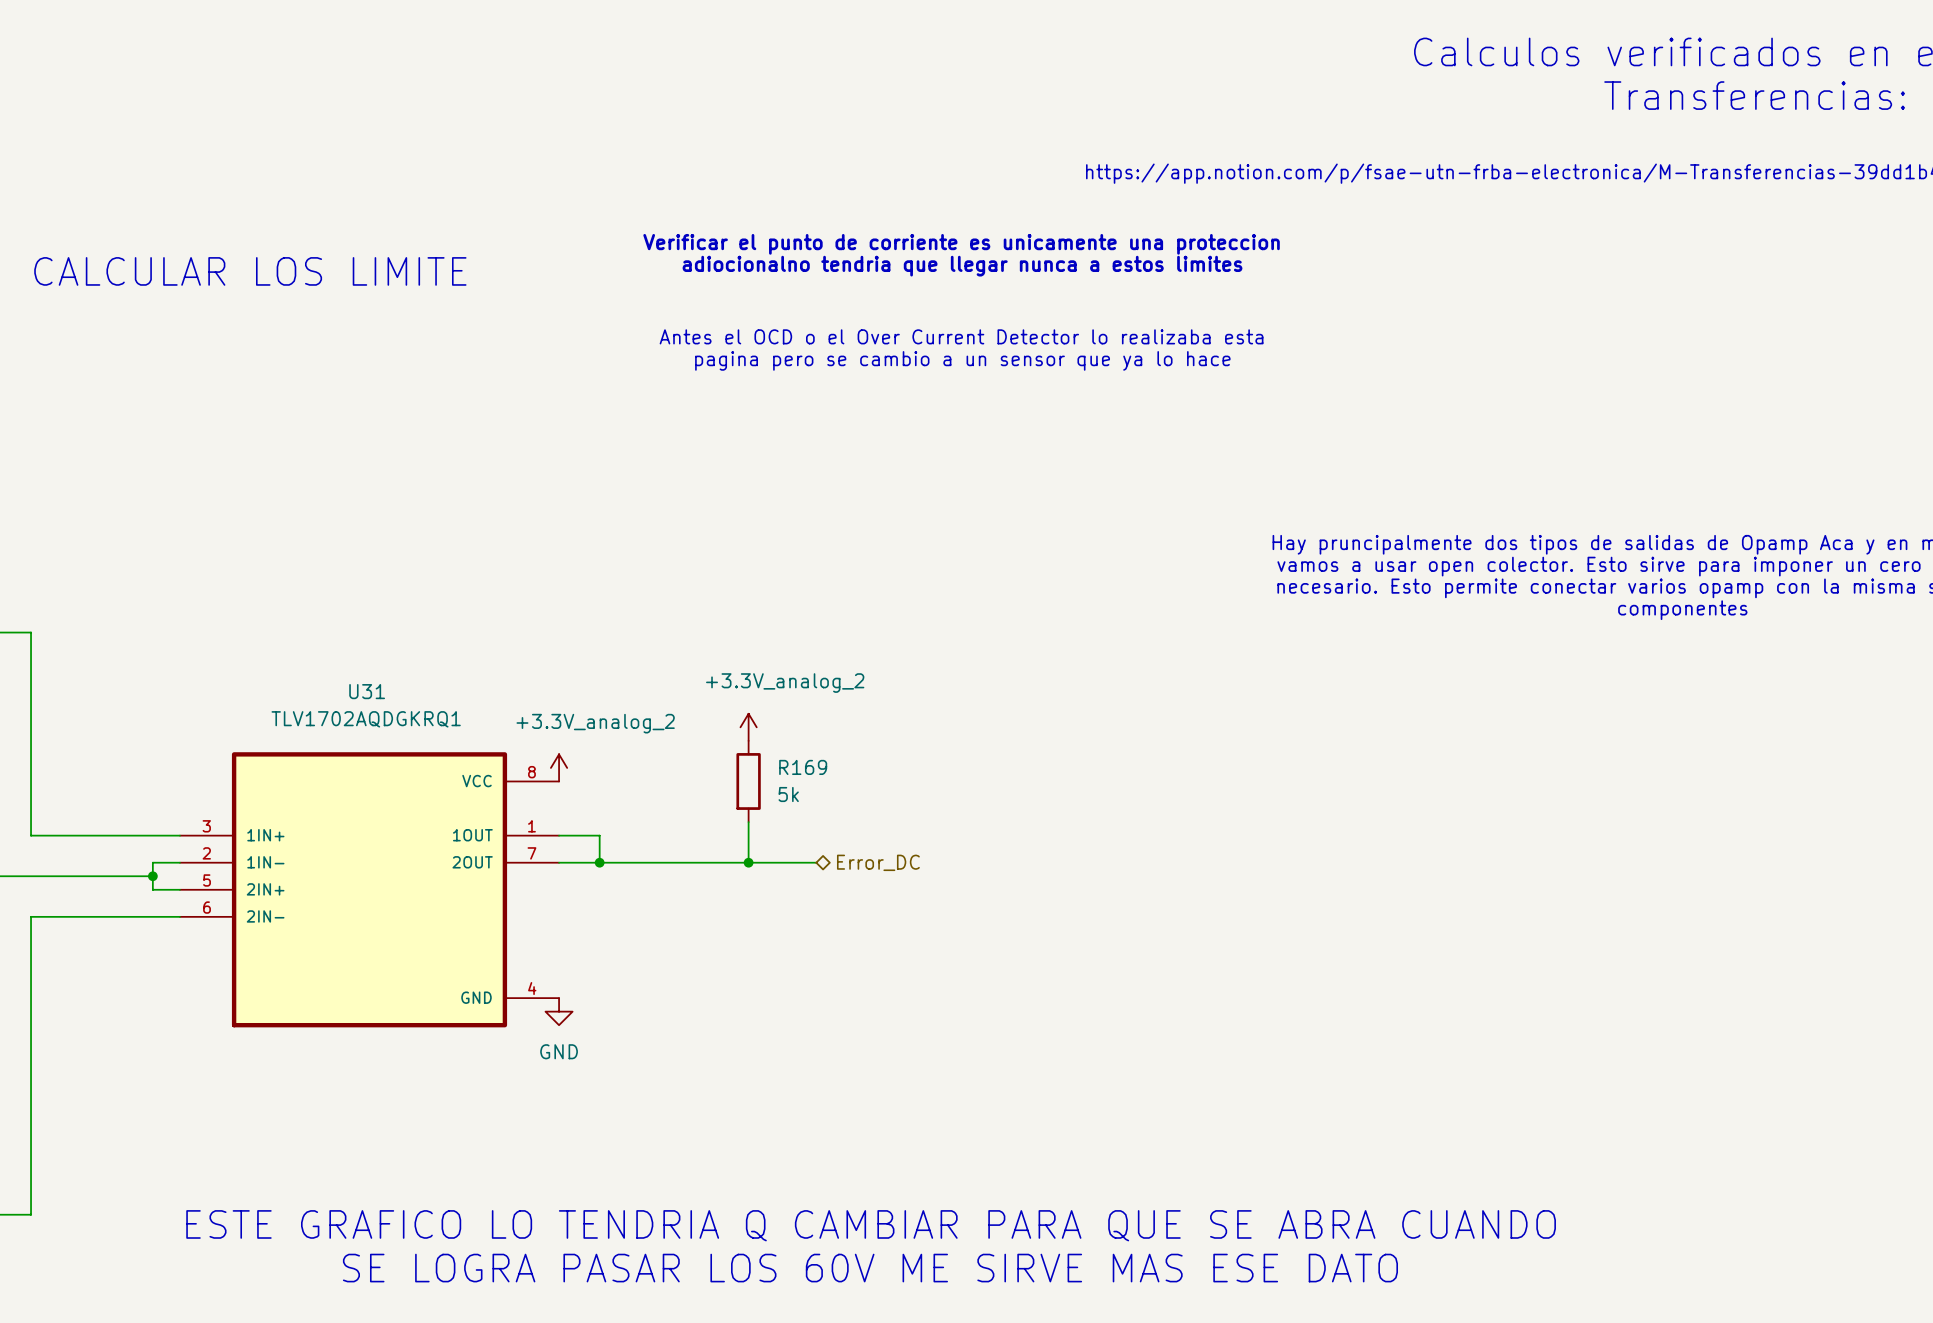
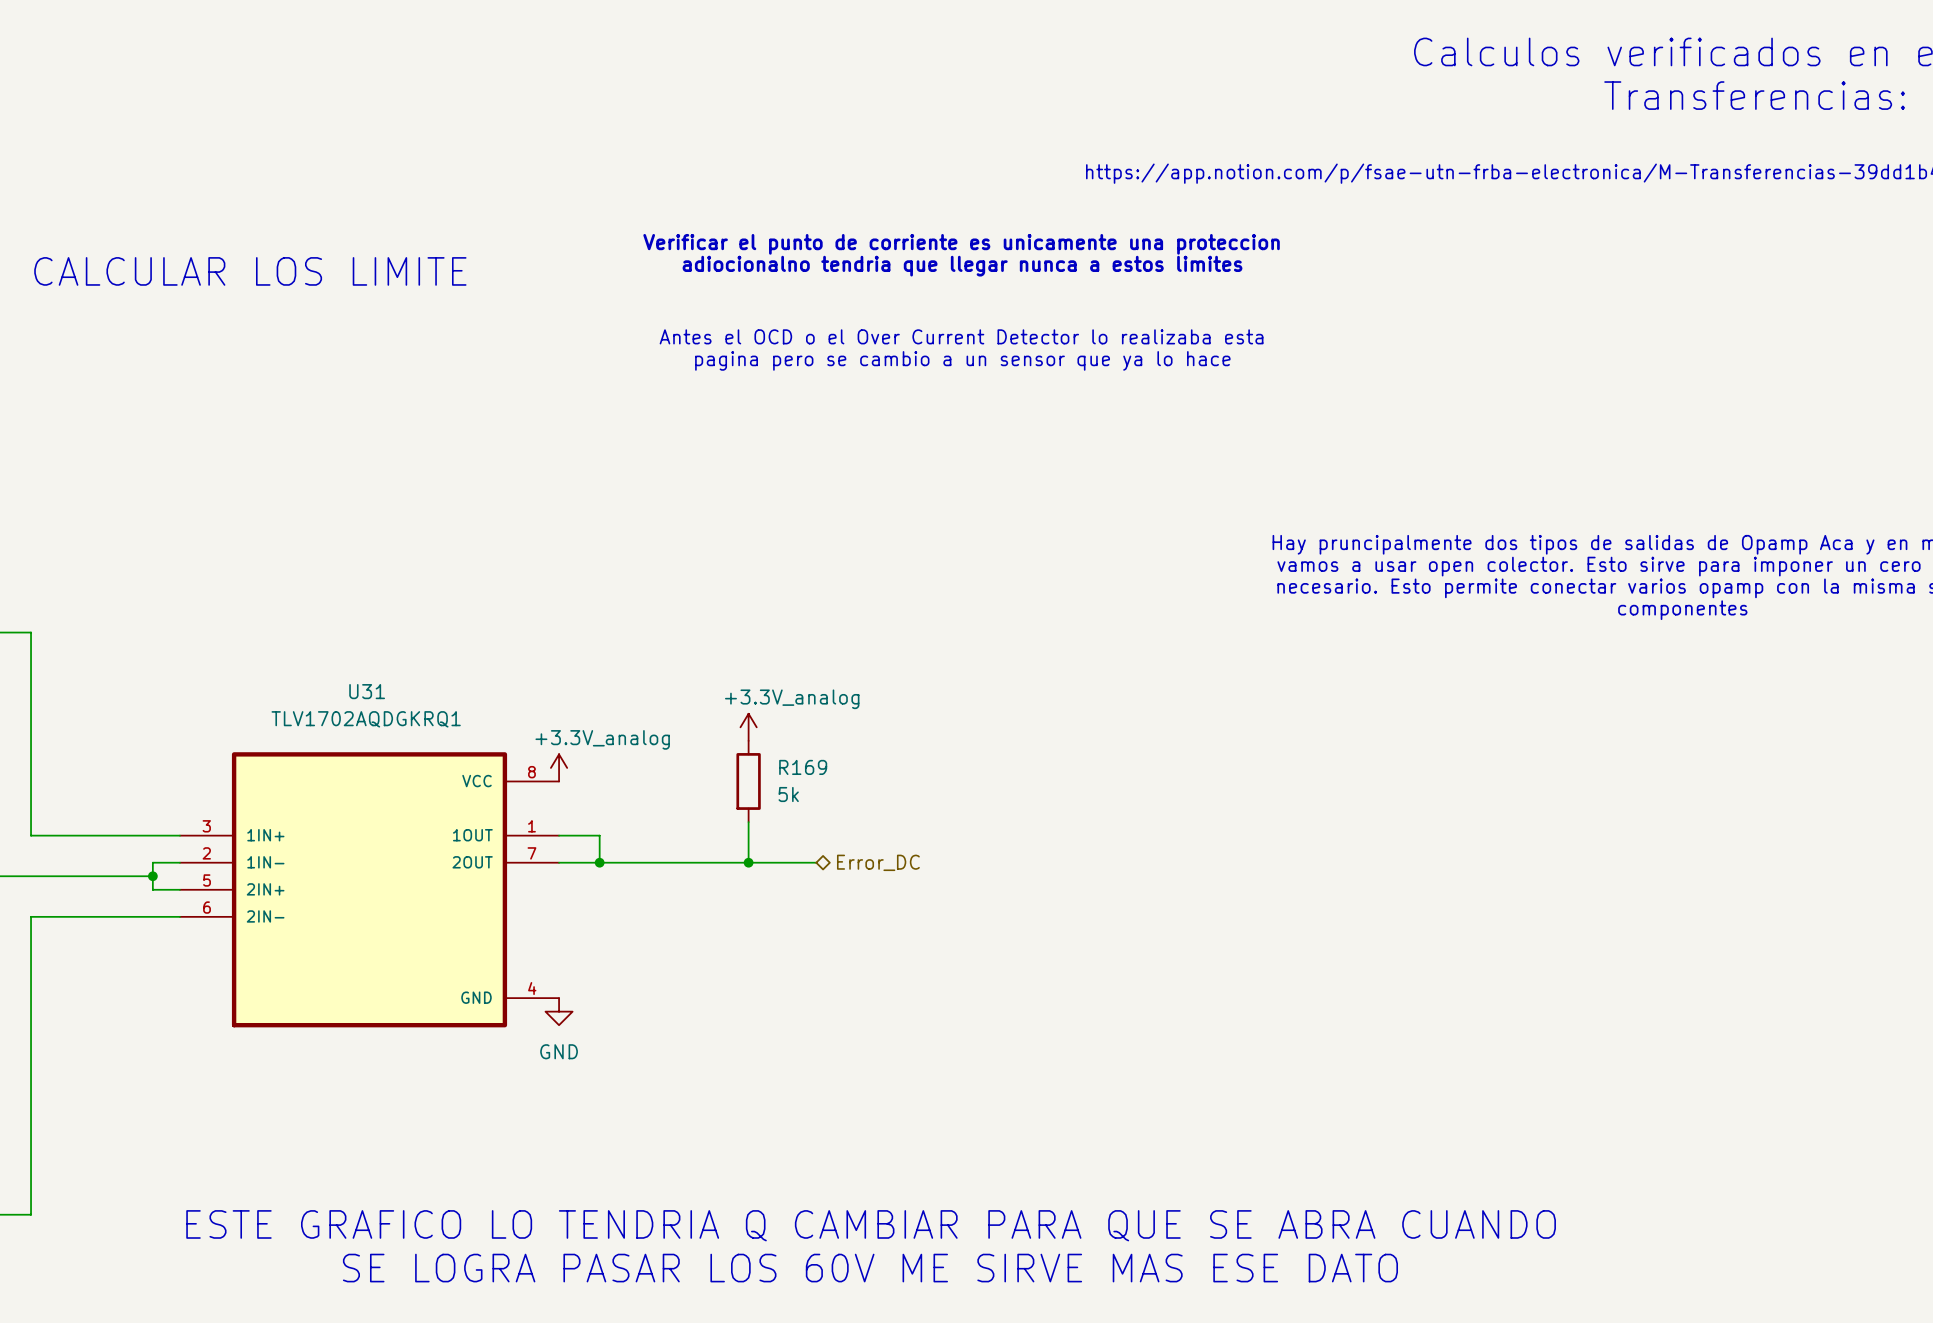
power symbol: +3.3V_analog_2 (748, 727) -> +3.3V_analog (748, 727)
power symbol: +3.3V_analog_2 (559, 767) -> +3.3V_analog (559, 767)

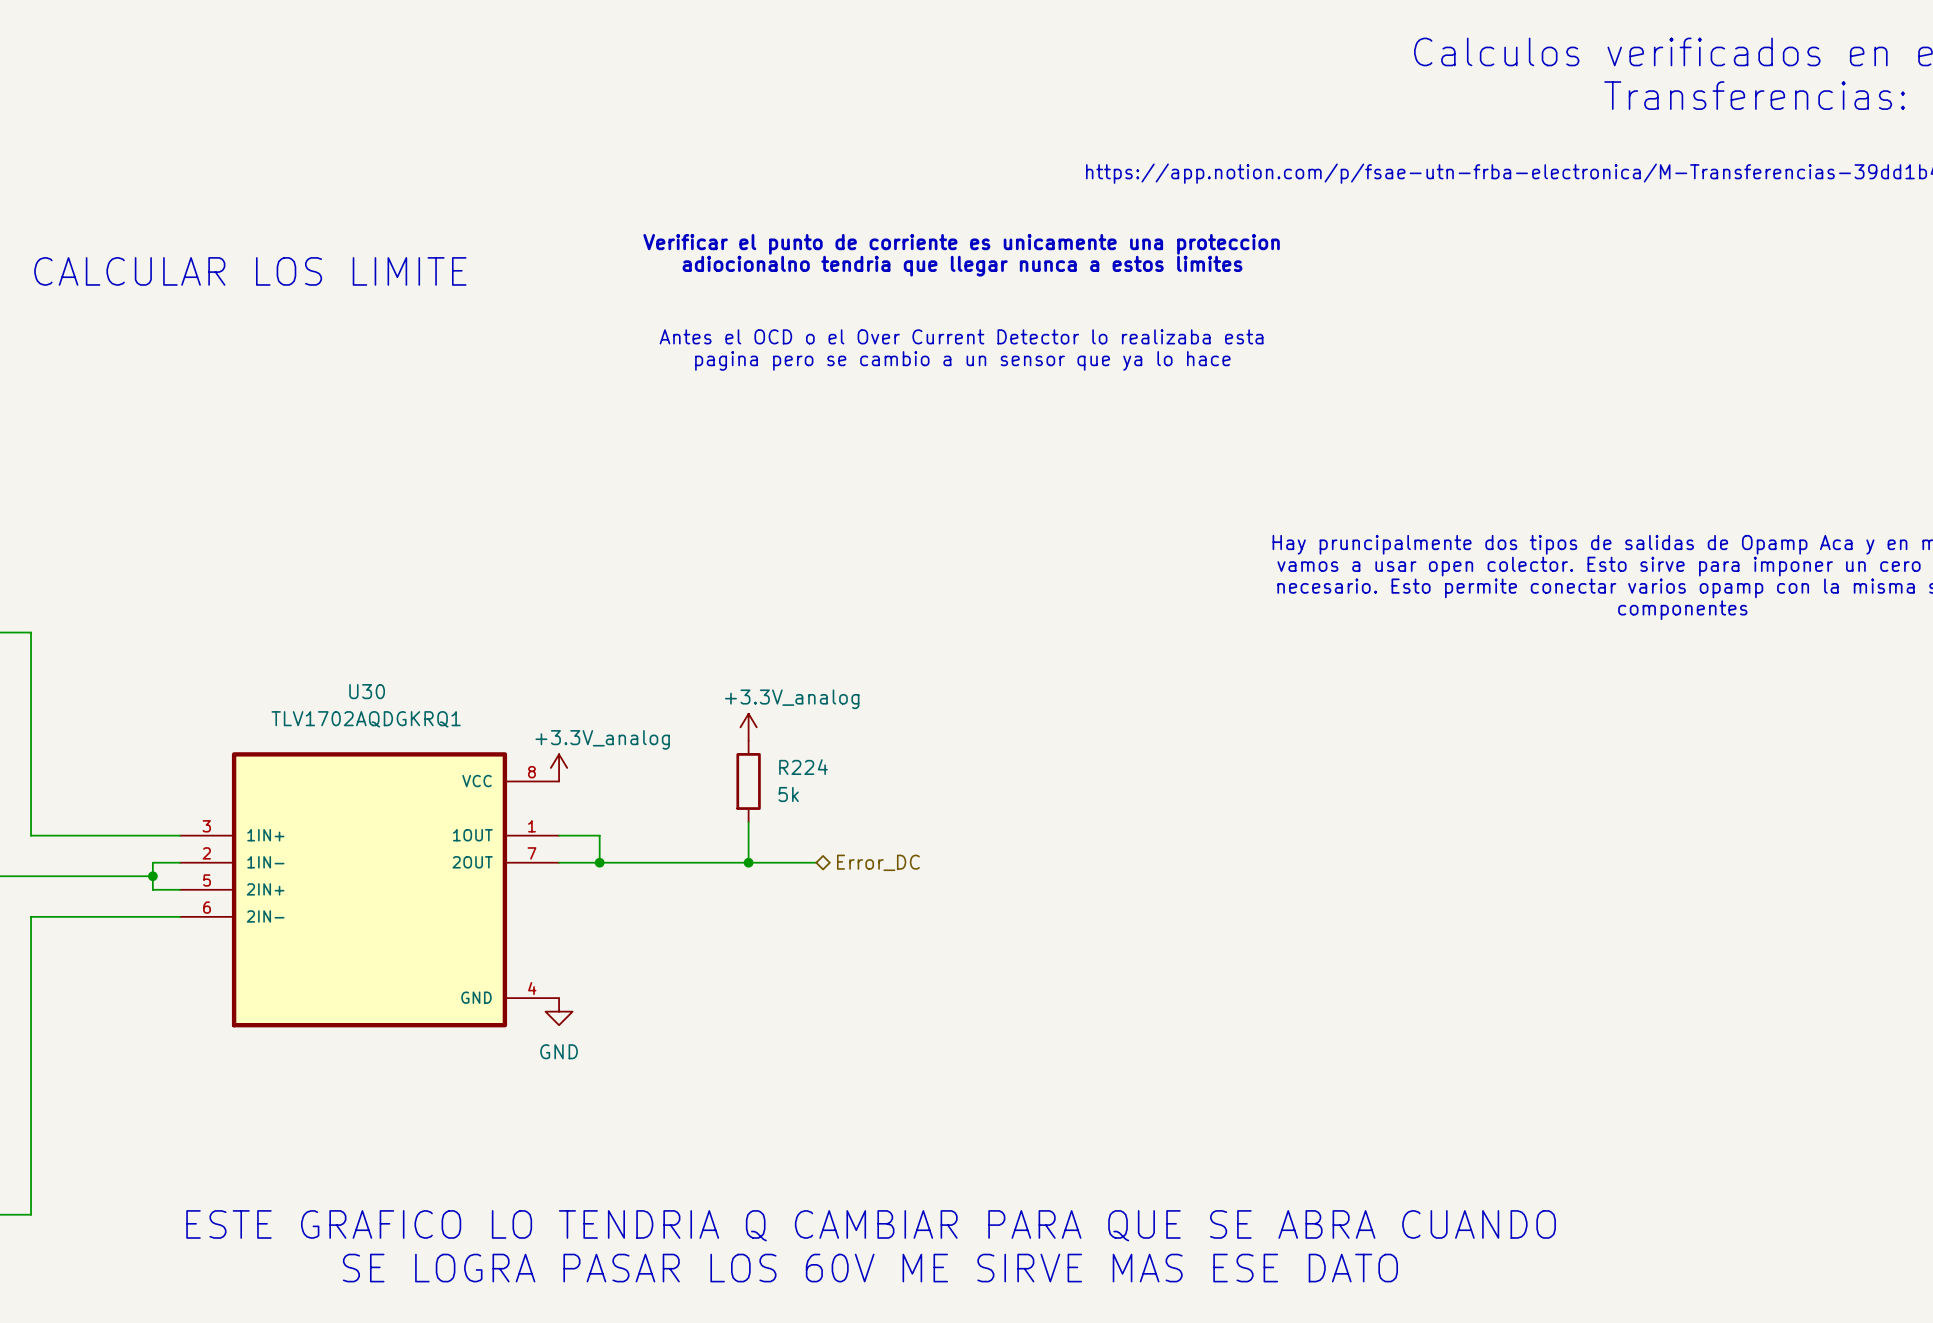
U31 name: U31 (367, 691) -> U30 (367, 691)
R169 name: R169 (803, 767) -> R224 (803, 767)

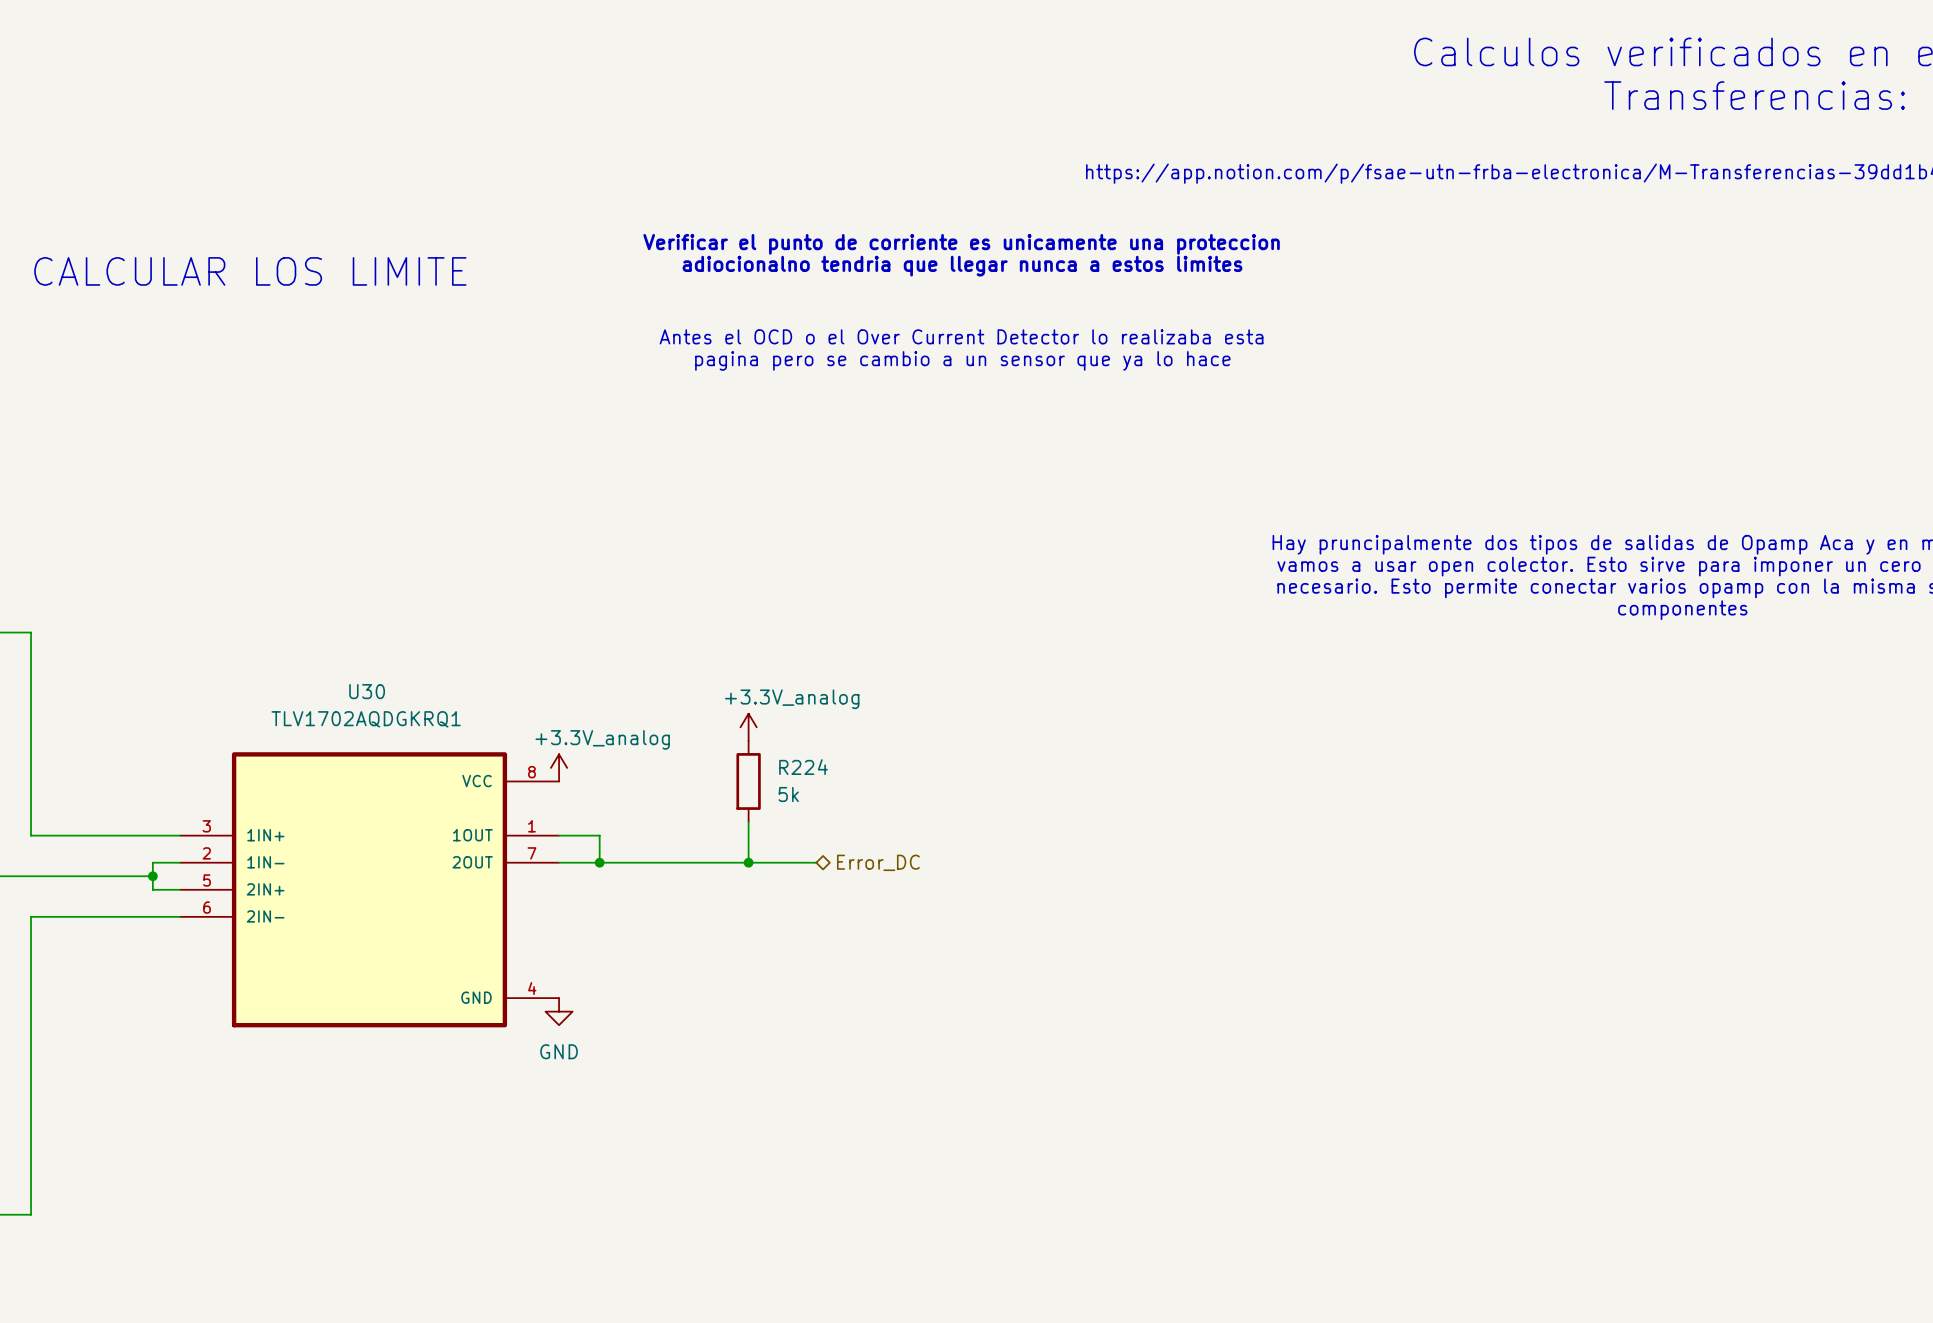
text: ESTE GRAFICO LO TENDRIA Q CAMBIAR PARA QUE SE ABRA CUANDO (871, 1225) -> none
text: SE LOGRA PASAR LOS 60V ME SIRVE MAS ESE DATO (870, 1268) -> none

